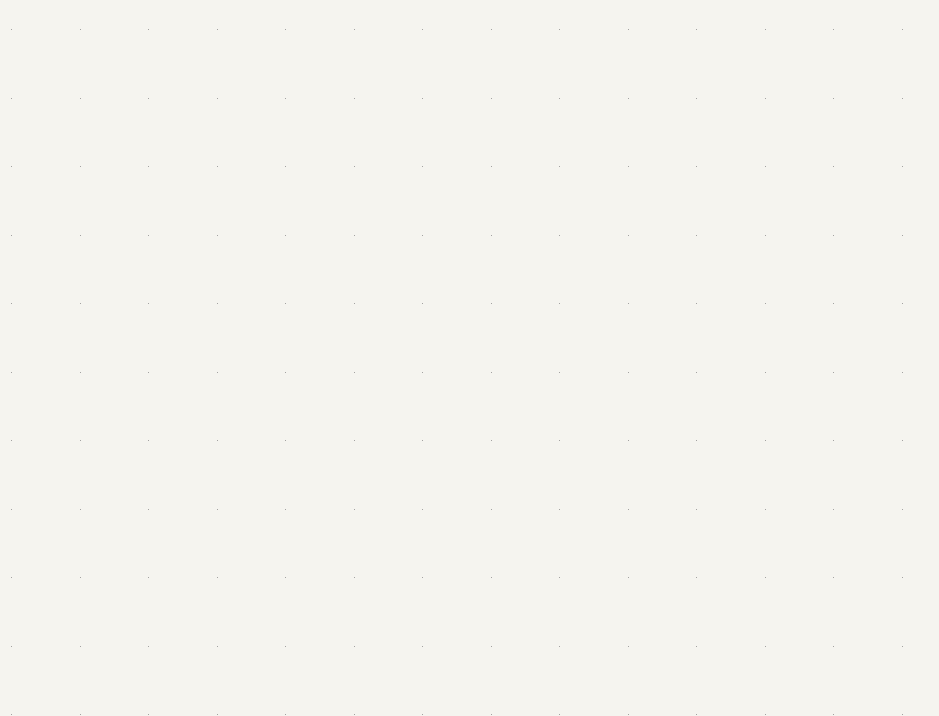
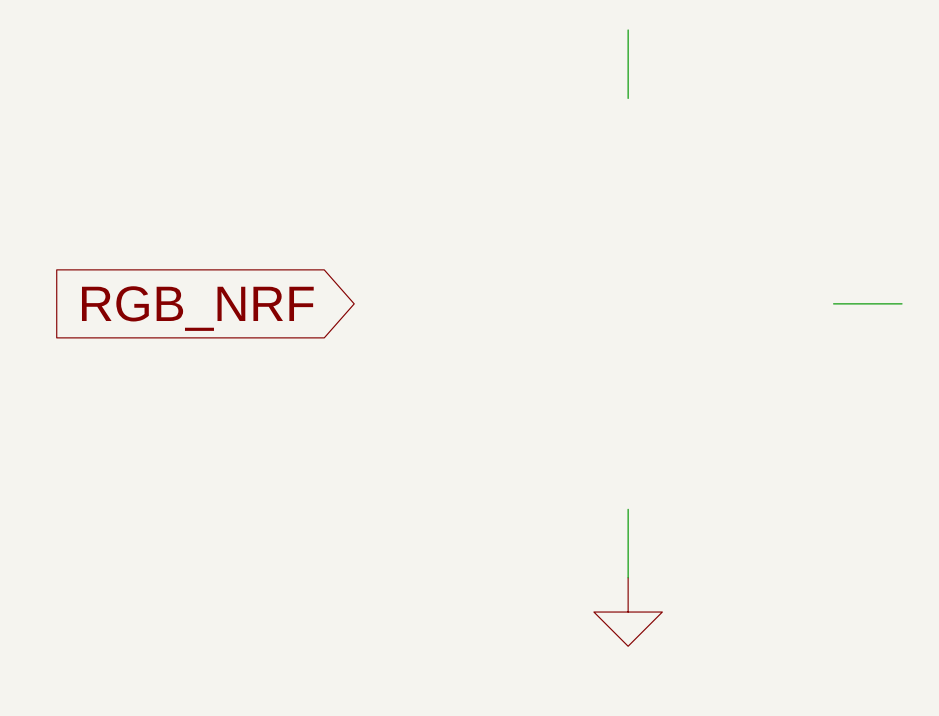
wire: none -> (628, 29) (628, 98)
wire: none -> (833, 303) (902, 303)
global label: none -> RGB_NRF (197, 308)
wire: none -> (628, 509) (628, 577)
power symbol: none -> (628, 612)

